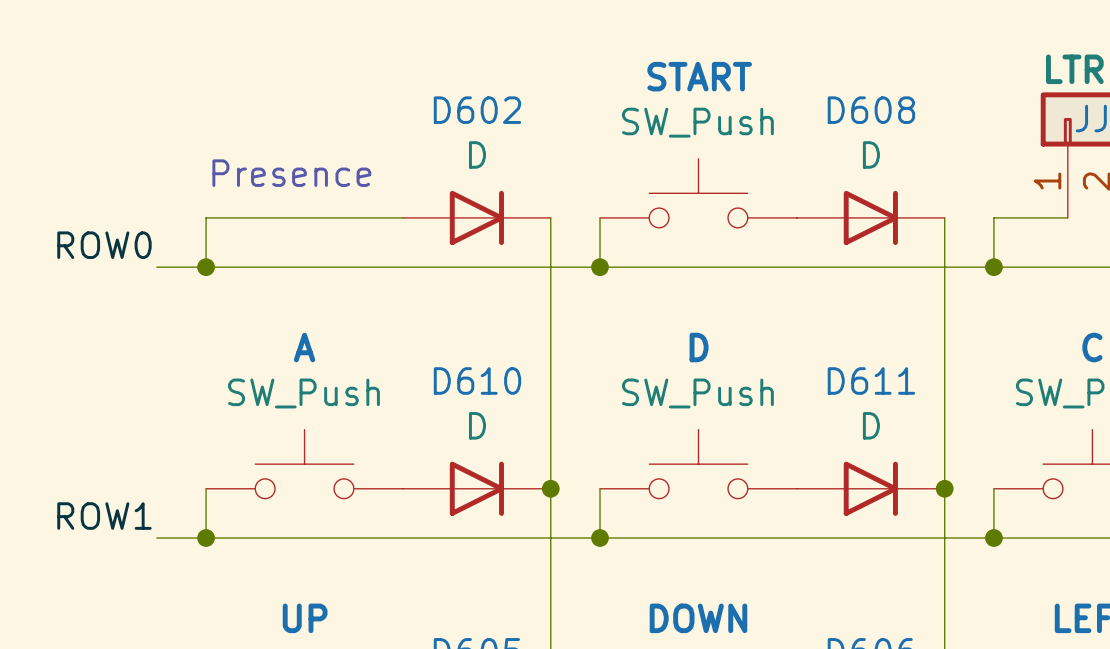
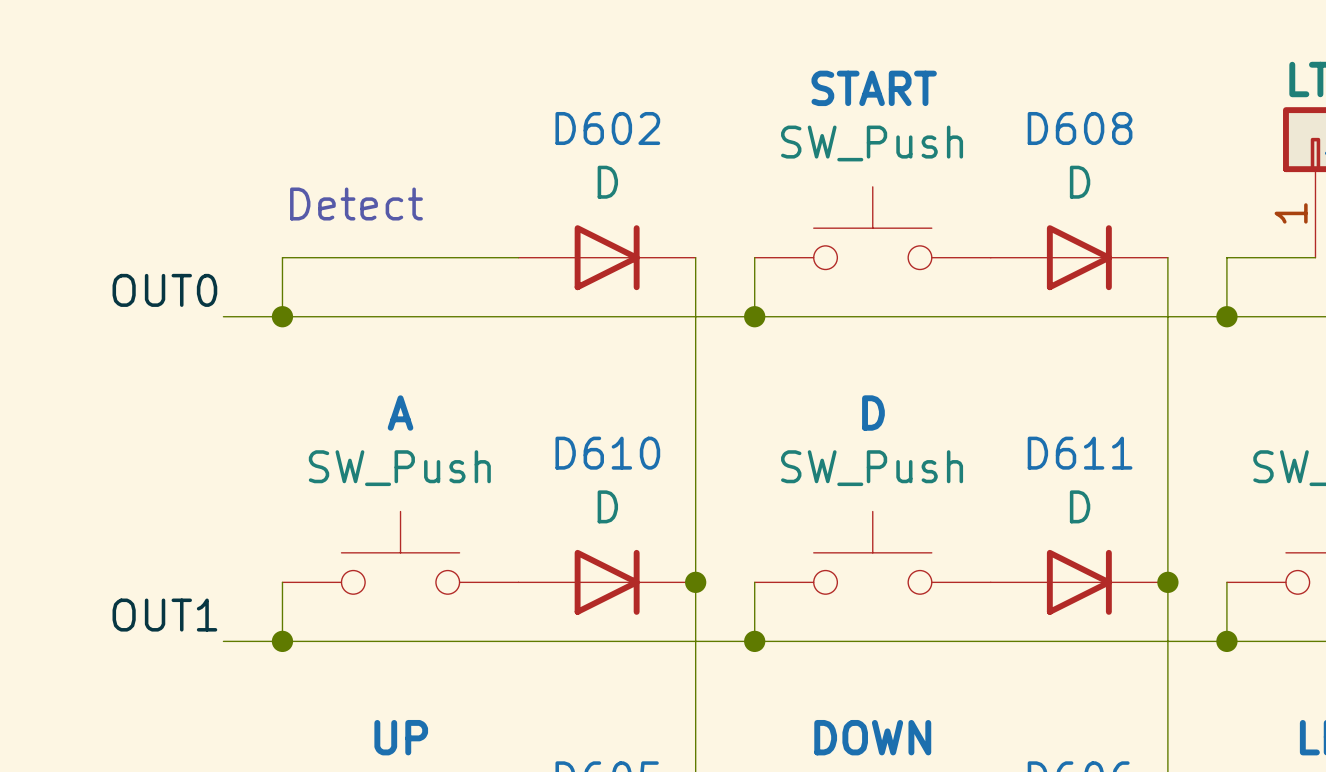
text: Presence (291, 173) -> Detect (356, 204)
label: ROW0 (104, 245) -> OUT0 (164, 290)
label: ROW1 (104, 516) -> OUT1 (164, 615)

